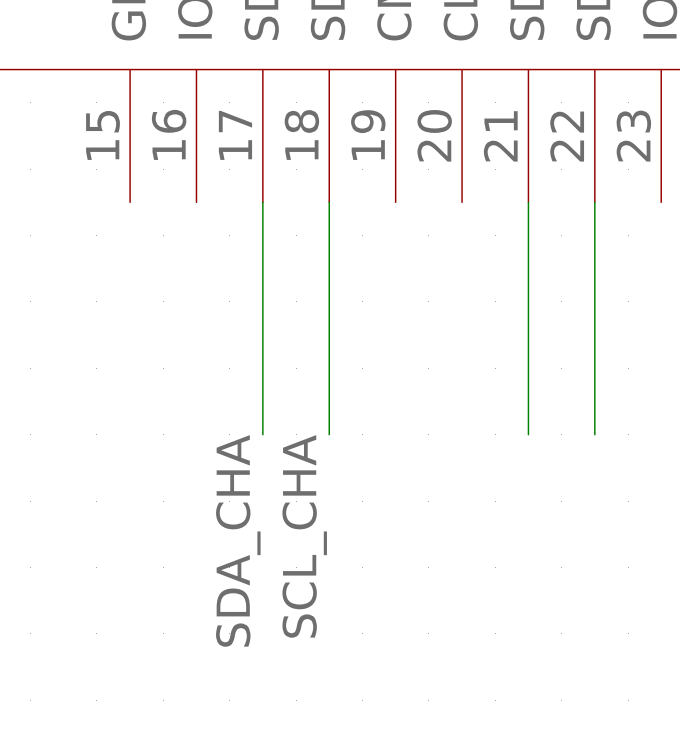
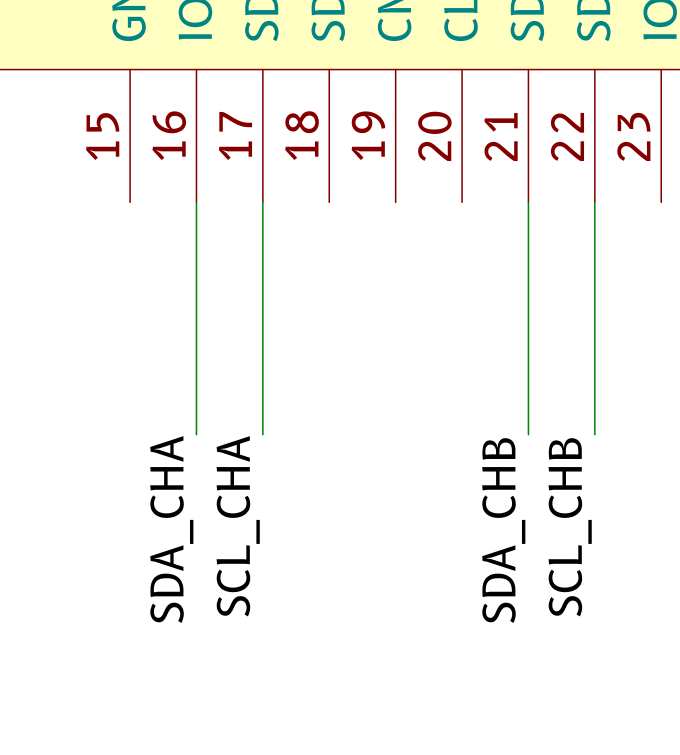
wire: (329, 202) (329, 434) -> (196, 202) (196, 434)
label: SCL_CHA (304, 536) -> none
label: none -> SCL_CHB (570, 527)
label: none -> SDA_CHA (171, 529)
label: SDA_CHA (238, 540) -> SCL_CHA (238, 526)
label: none -> SDA_CHB (503, 530)

